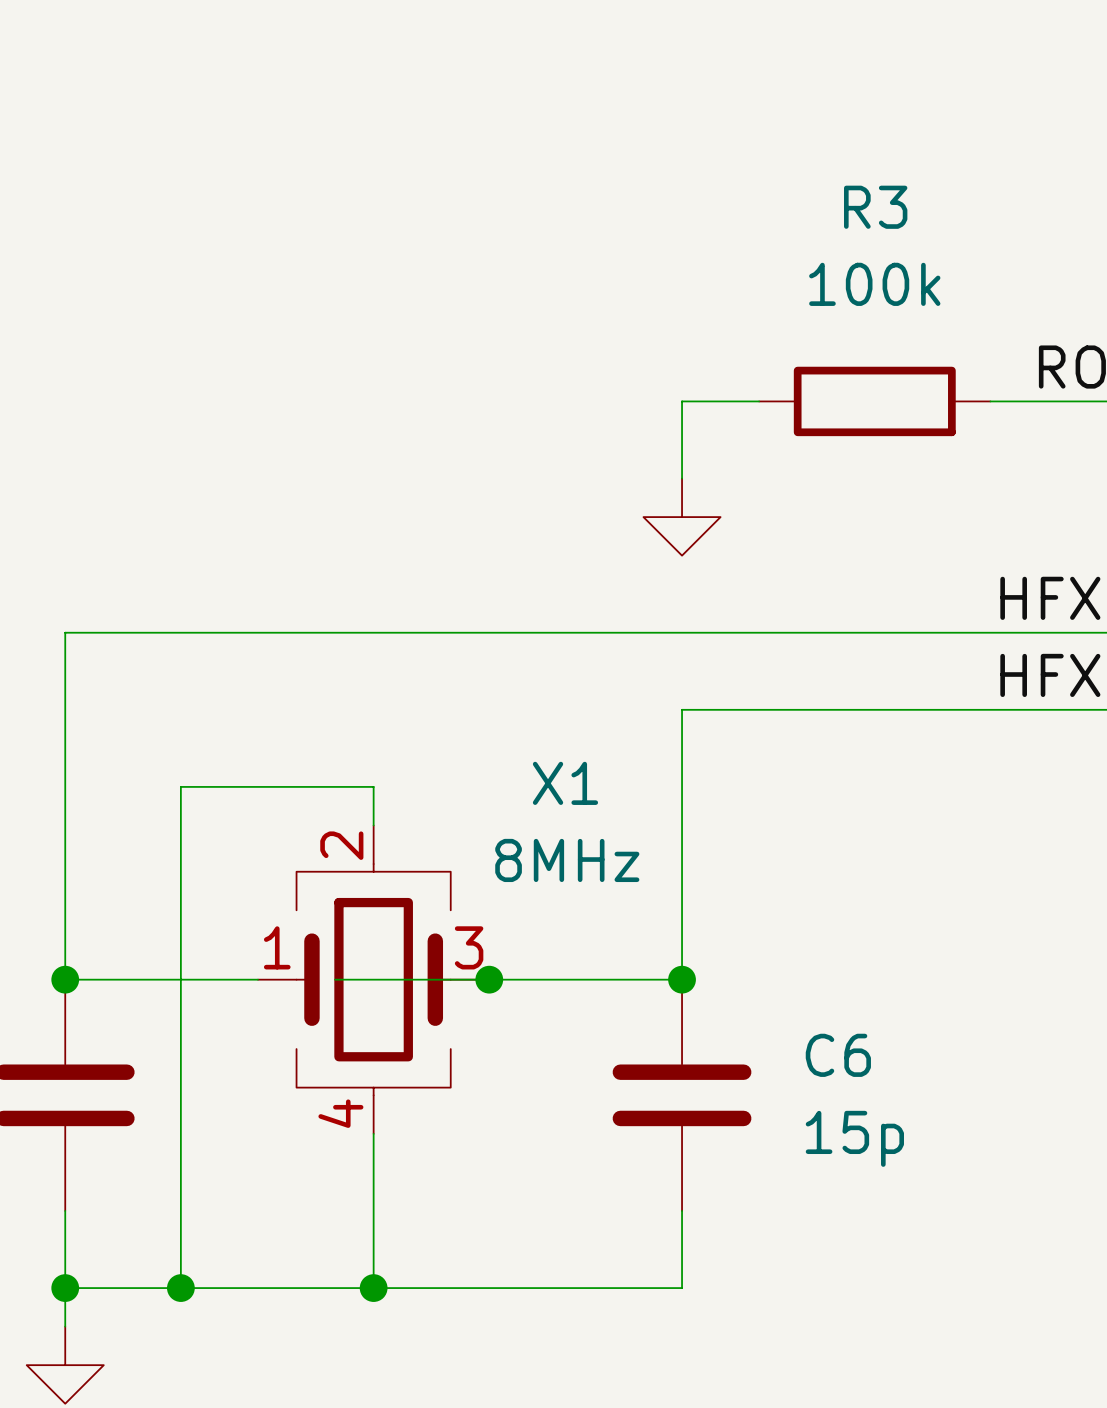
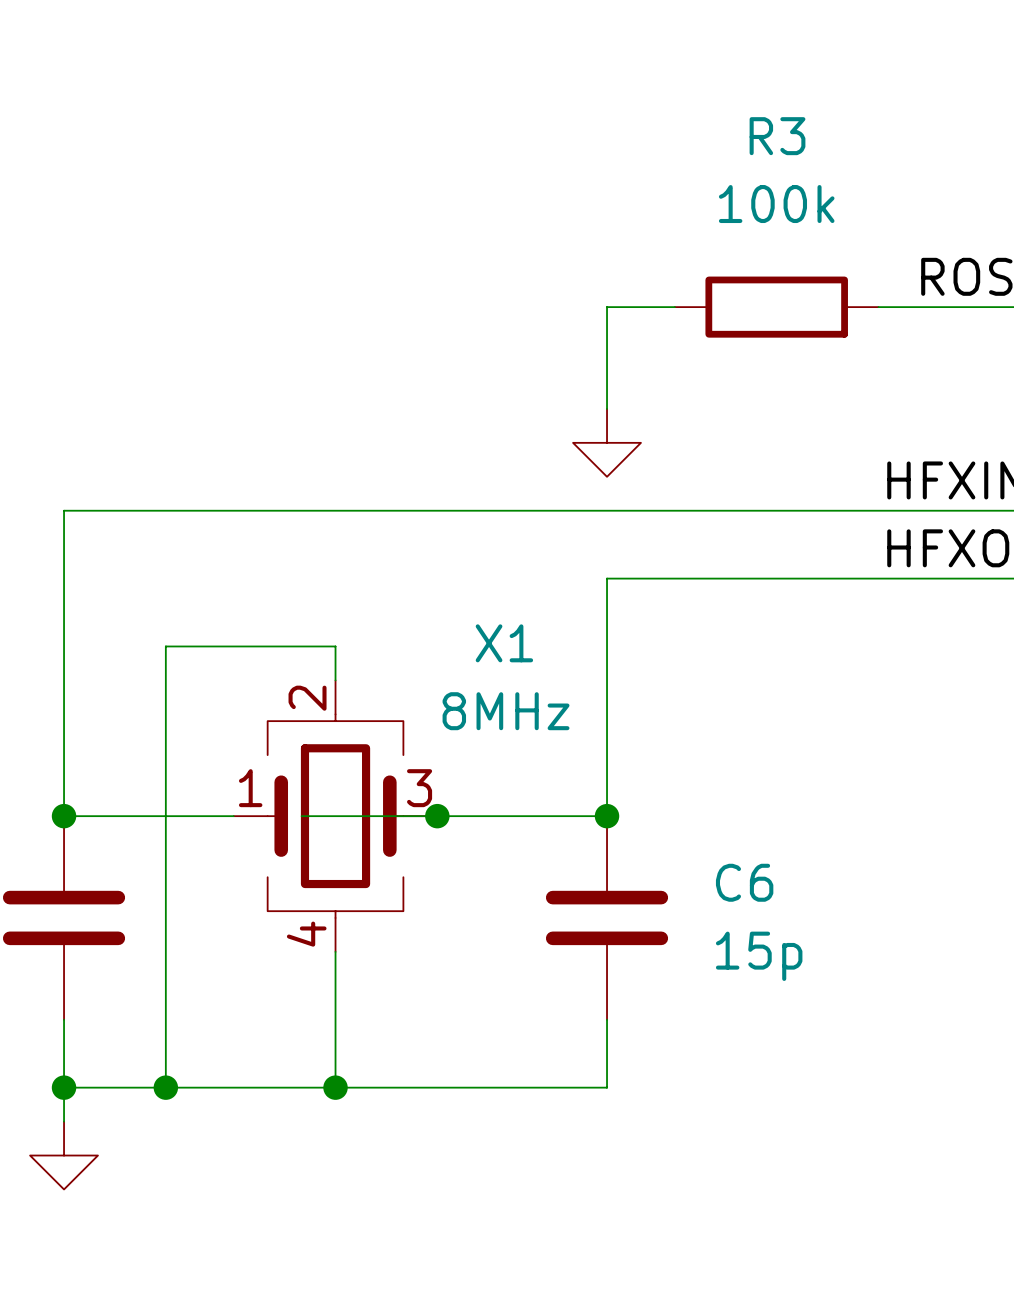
power symbol position: (682, 517) -> (607, 442)

